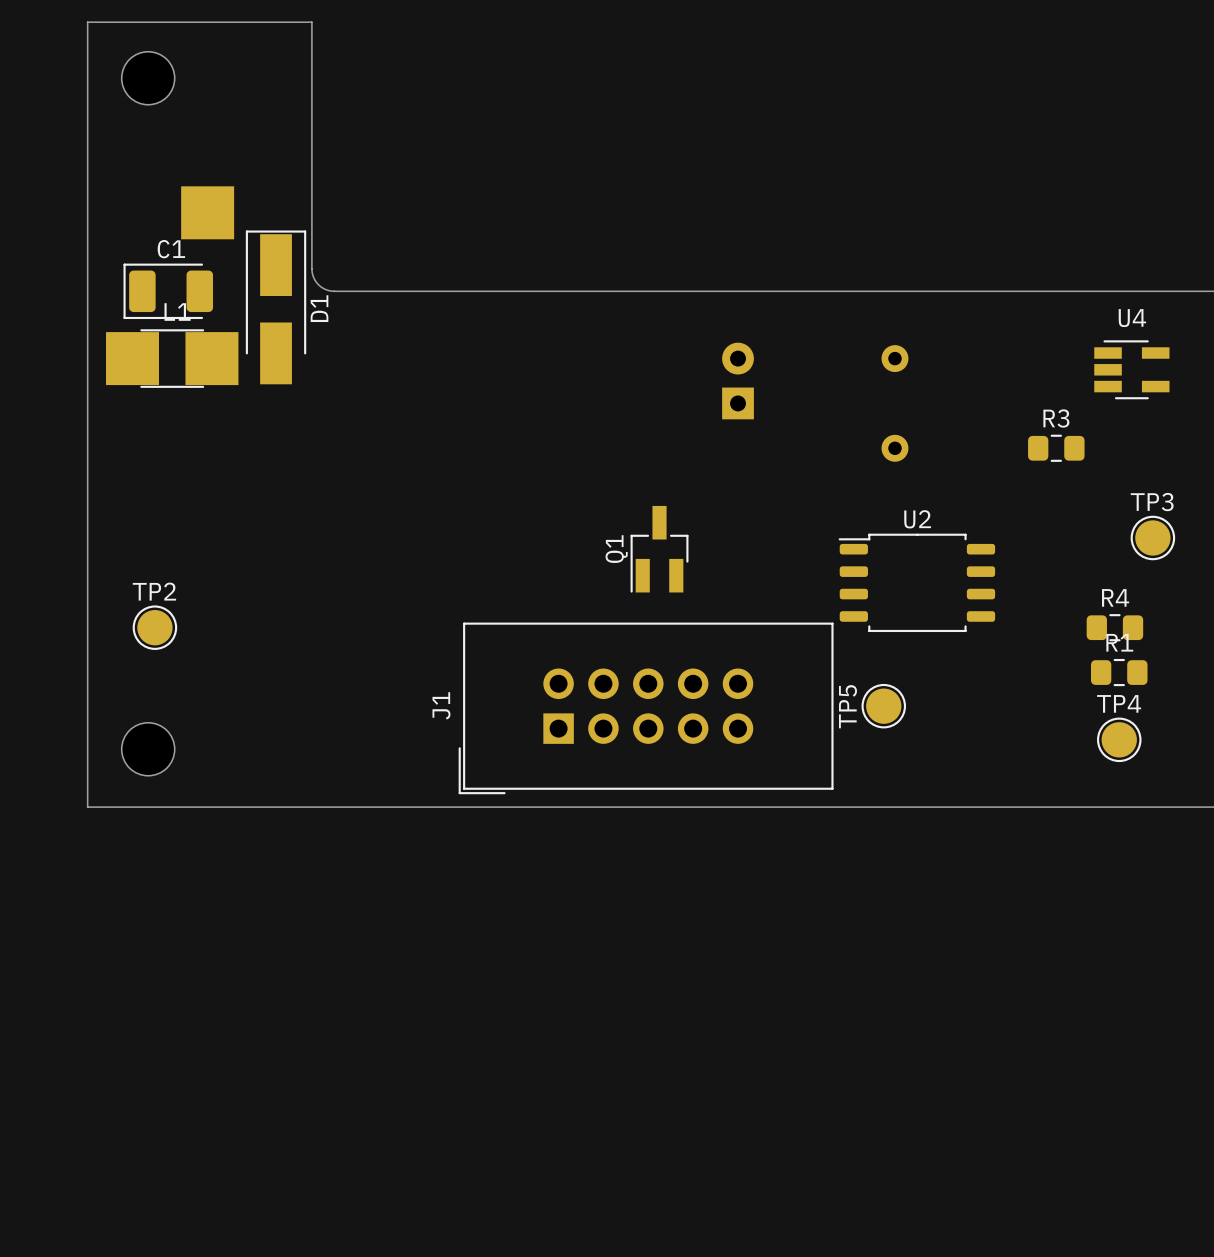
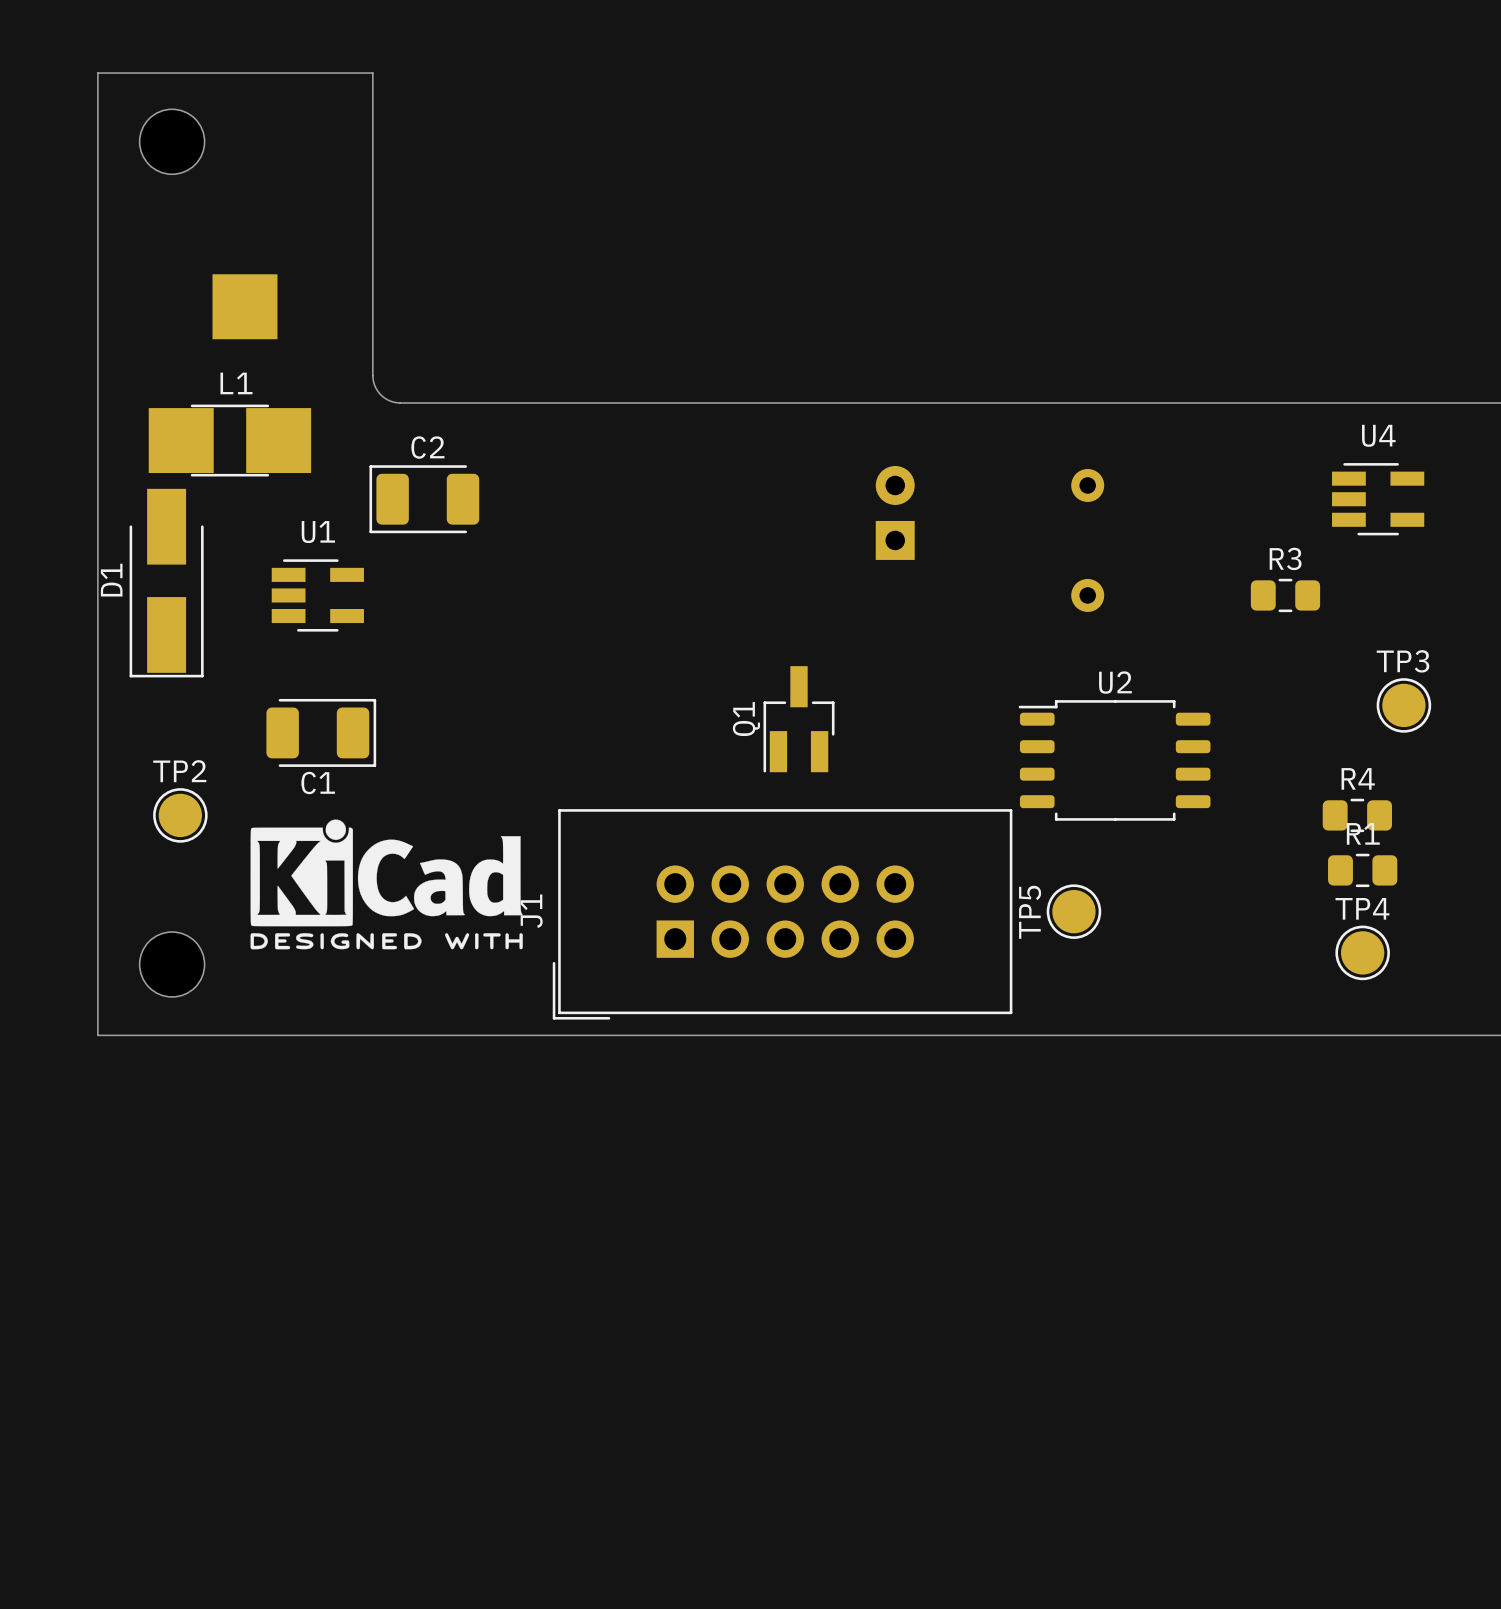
C1 rotation: 0° (168, 291) -> 180° (321, 732)
C1 position: (168, 291) -> (321, 732)
D1 rotation: 0° (276, 307) -> 180° (166, 583)
D1 position: (276, 307) -> (166, 583)
L1 position: (172, 358) -> (229, 440)
C2: none -> (424, 499)
U1: none -> (317, 595)
drawing: none -> [250, 819, 523, 950]

